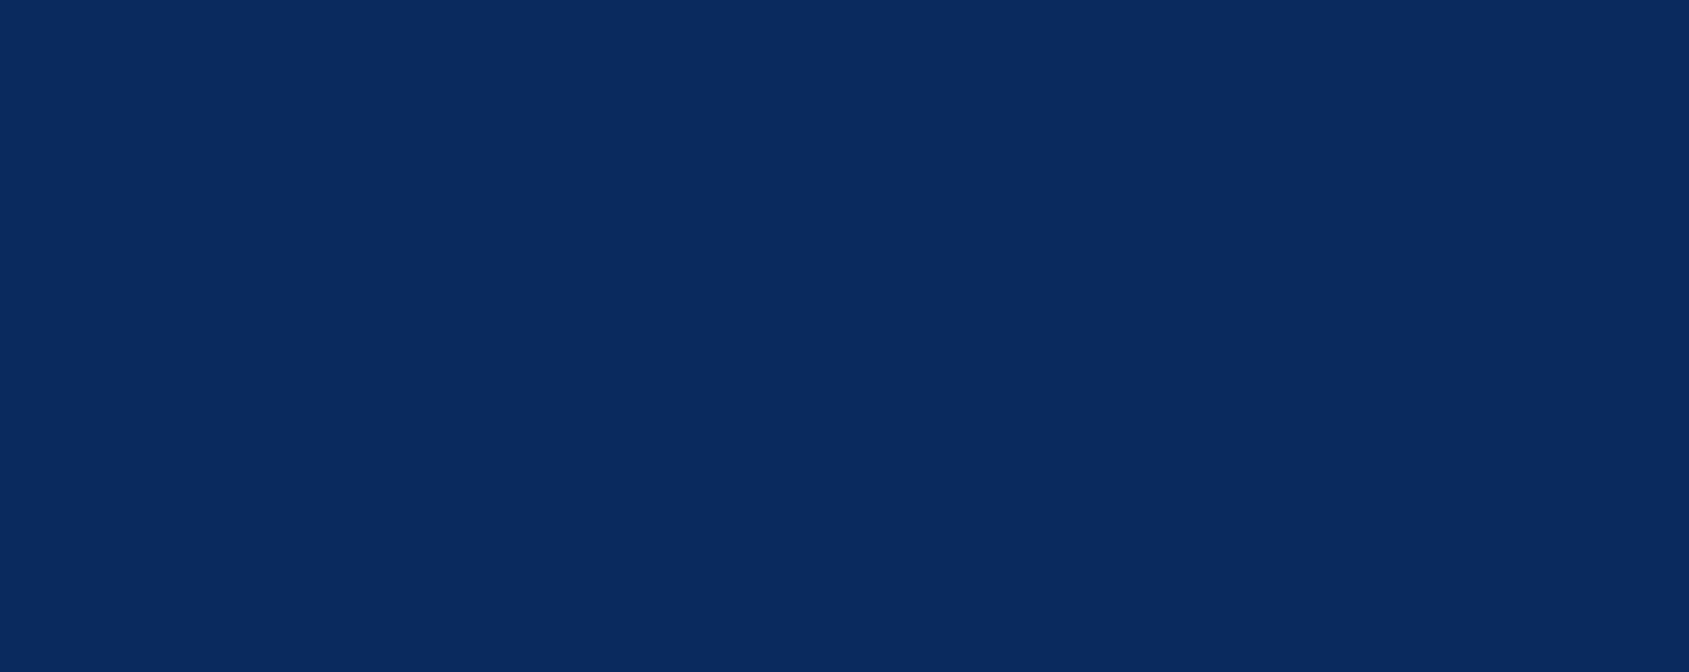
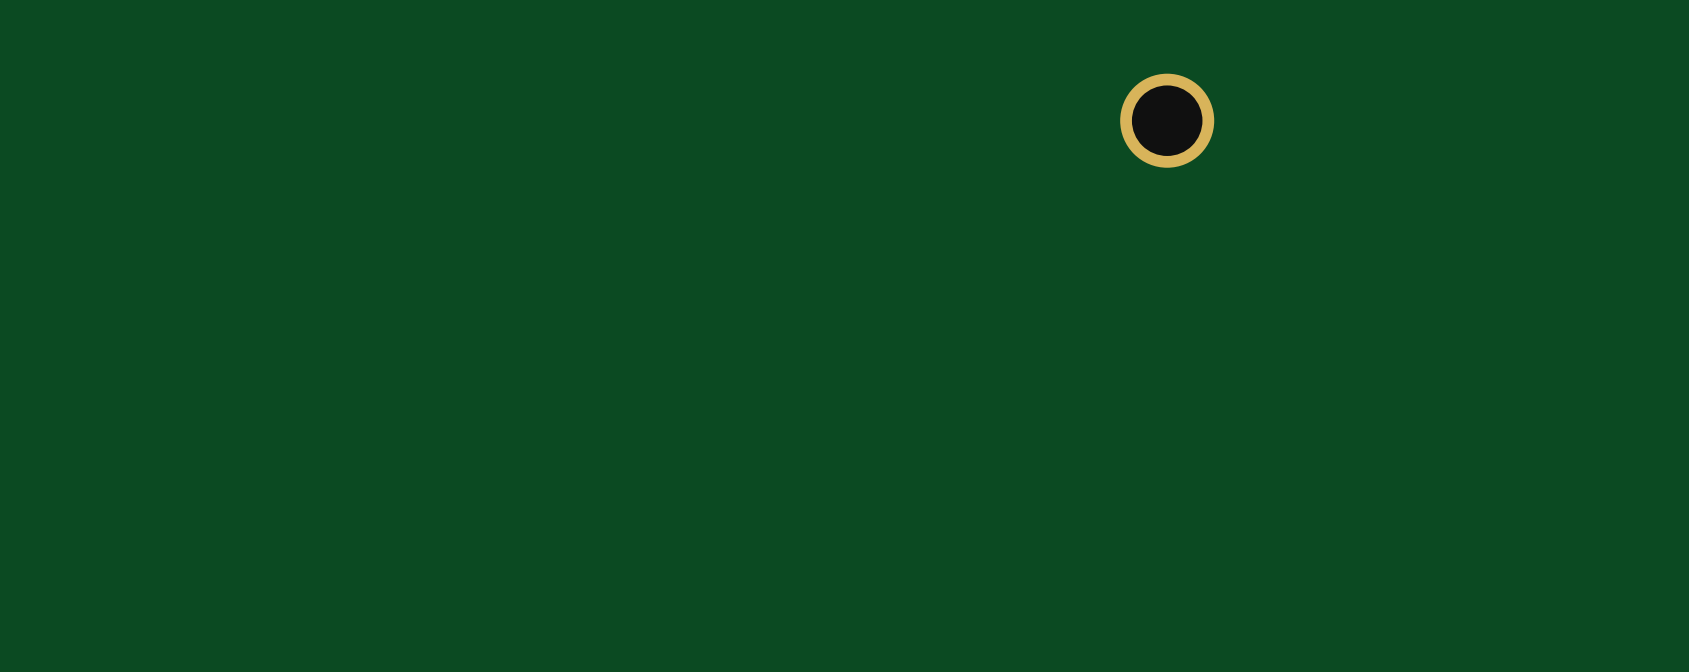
part: none -> (1167, 120)

